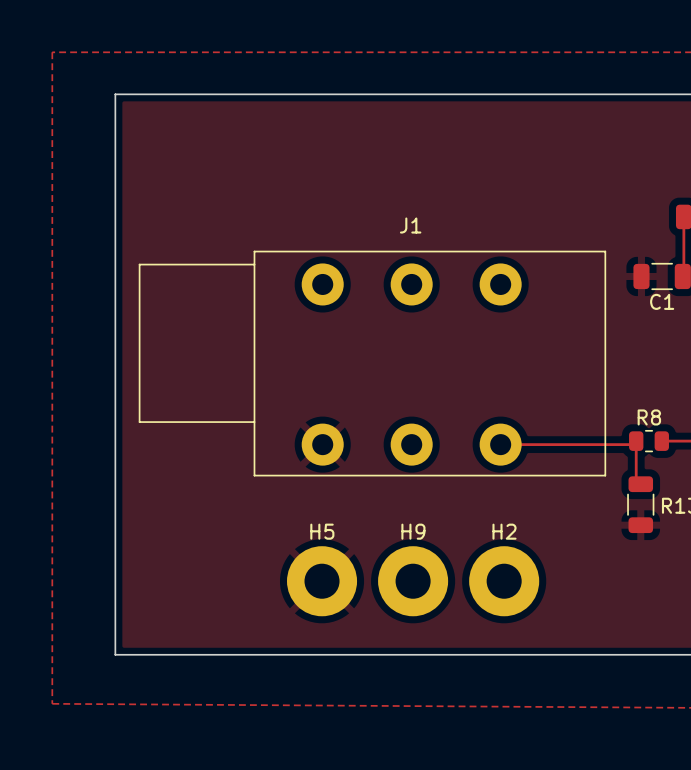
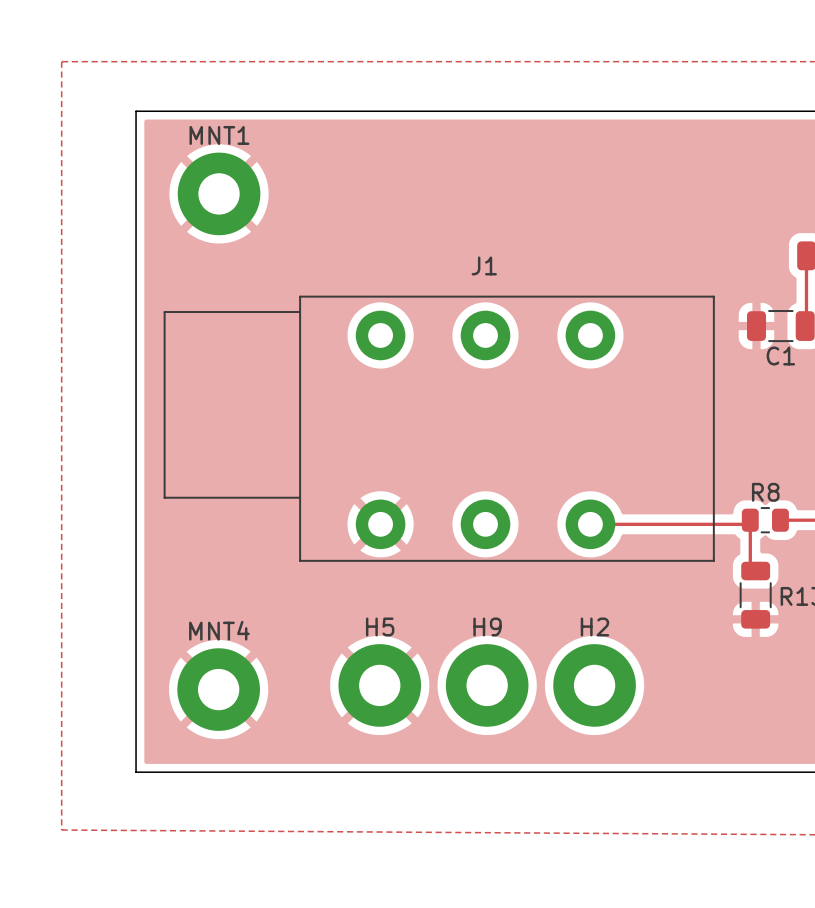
MNT1: none -> (219, 193)
MNT4: none -> (218, 689)

